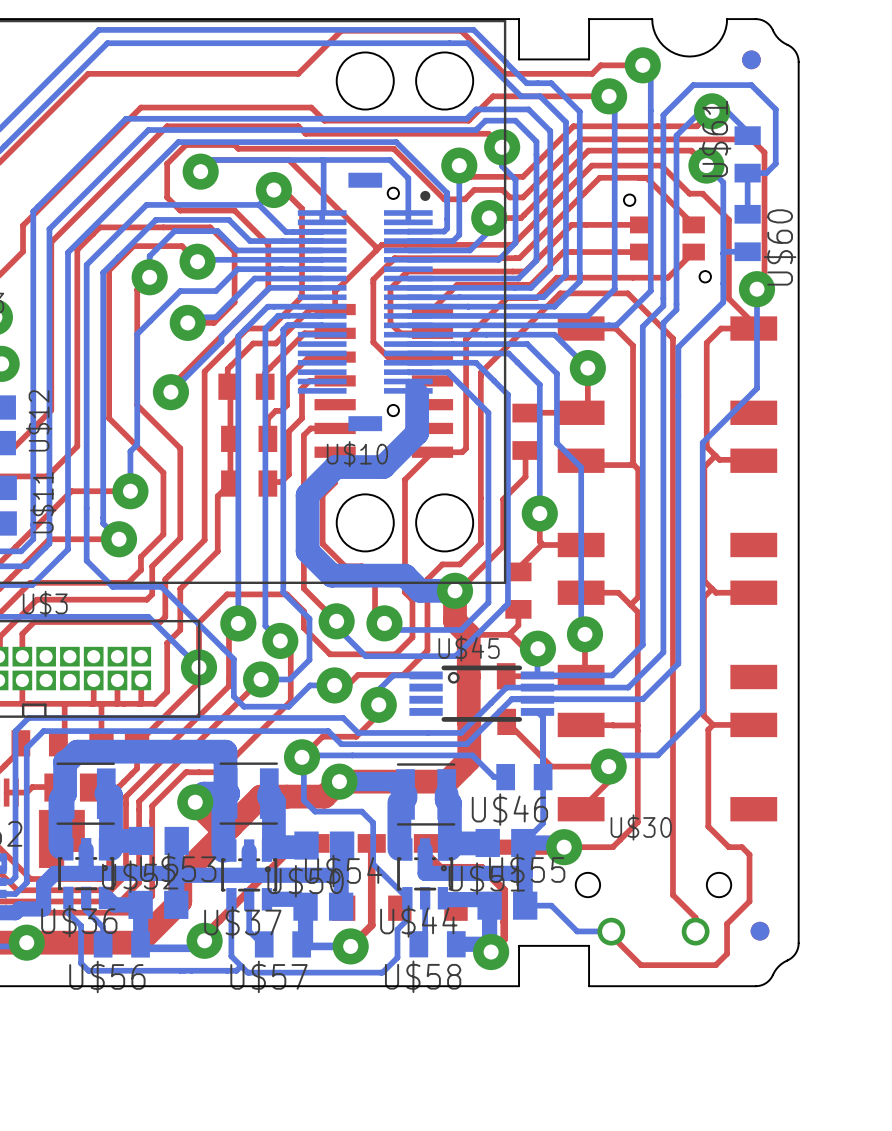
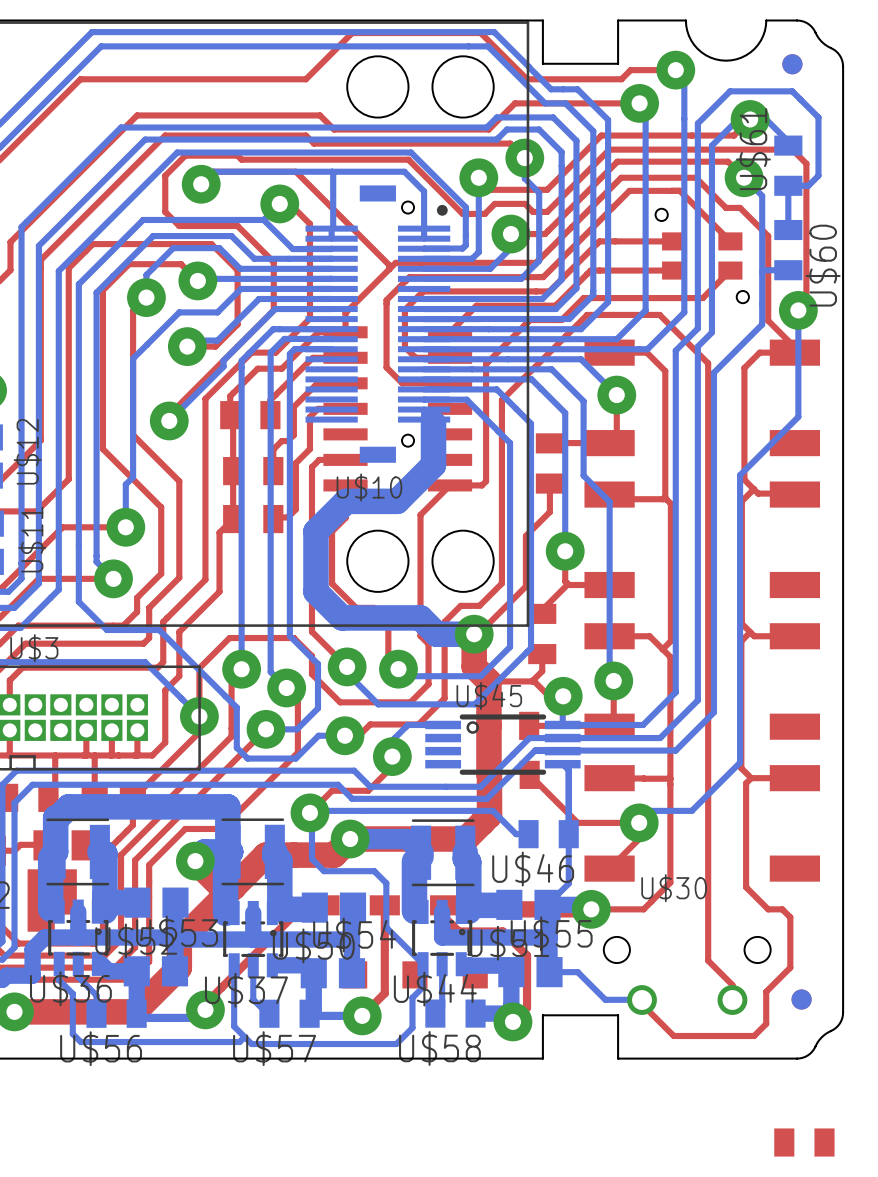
part: none -> (804, 1142)

